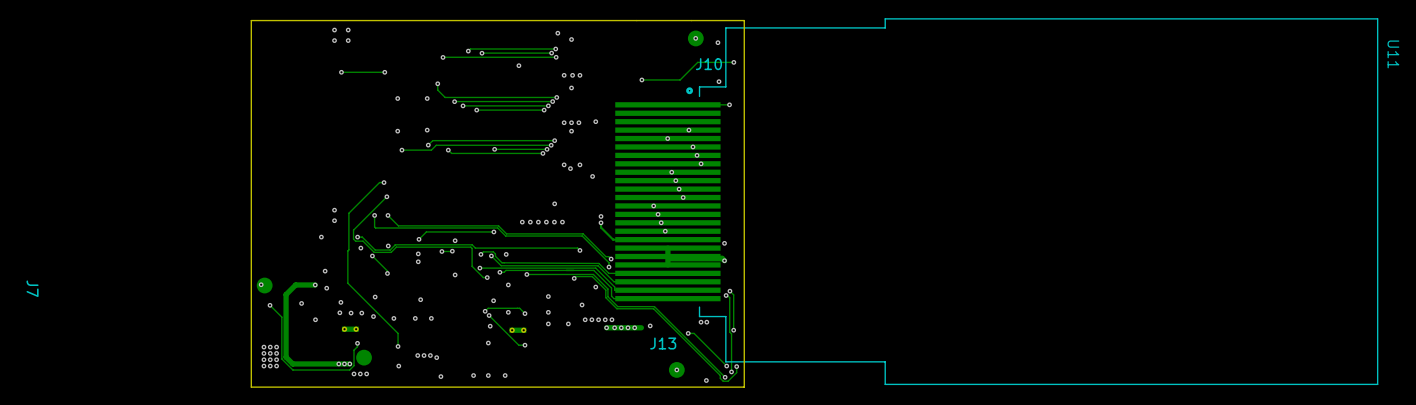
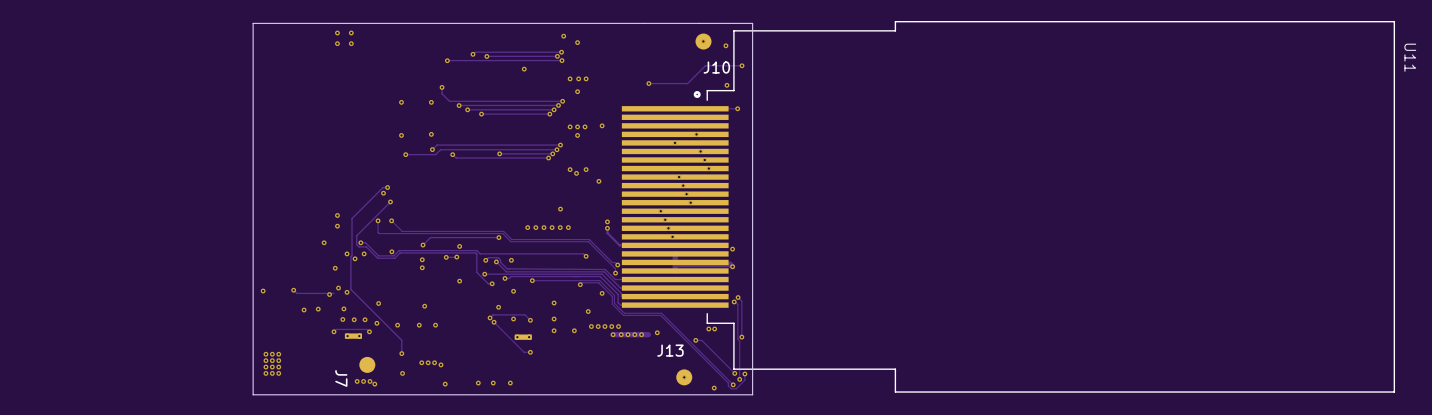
via: (341, 72) -> none
track: (384, 72) (341, 72) -> none
via: (384, 72) -> none
via: none -> (383, 193)
via: none -> (347, 253)
via: none -> (355, 258)
track: (372, 255) (387, 271) (387, 273) -> none
via: (372, 255) -> none
via: none -> (335, 268)
via: (325, 271) -> none
via: (387, 273) -> none
via: none -> (338, 288)
track: none -> (293, 290) (296, 293) (333, 293)
via: none -> (293, 290)
track: (315, 284) (295, 284) (286, 294) (286, 357) (292, 363) (349, 363) -> none
via: (315, 284) -> none
part: (264, 285) -> none
via: none -> (347, 292)
J7 name position: J7 (32, 288) -> J7 (341, 378)
via: none -> (318, 309)
track: (270, 305) (281, 317) (281, 358) (292, 370) (349, 370) (354, 365) (354, 350) (357, 346) (357, 343) -> none
via: (270, 305) -> none
via: (315, 319) -> none
via: none -> (333, 331)
track: none -> (369, 331) (367, 329) (336, 329) (333, 331)
via: none -> (369, 331)
via: (490, 326) -> none
via: (357, 343) -> none
via: (488, 343) -> none
via: (338, 363) -> none
via: (344, 363) -> none
via: (349, 363) -> none
via: none -> (374, 384)

